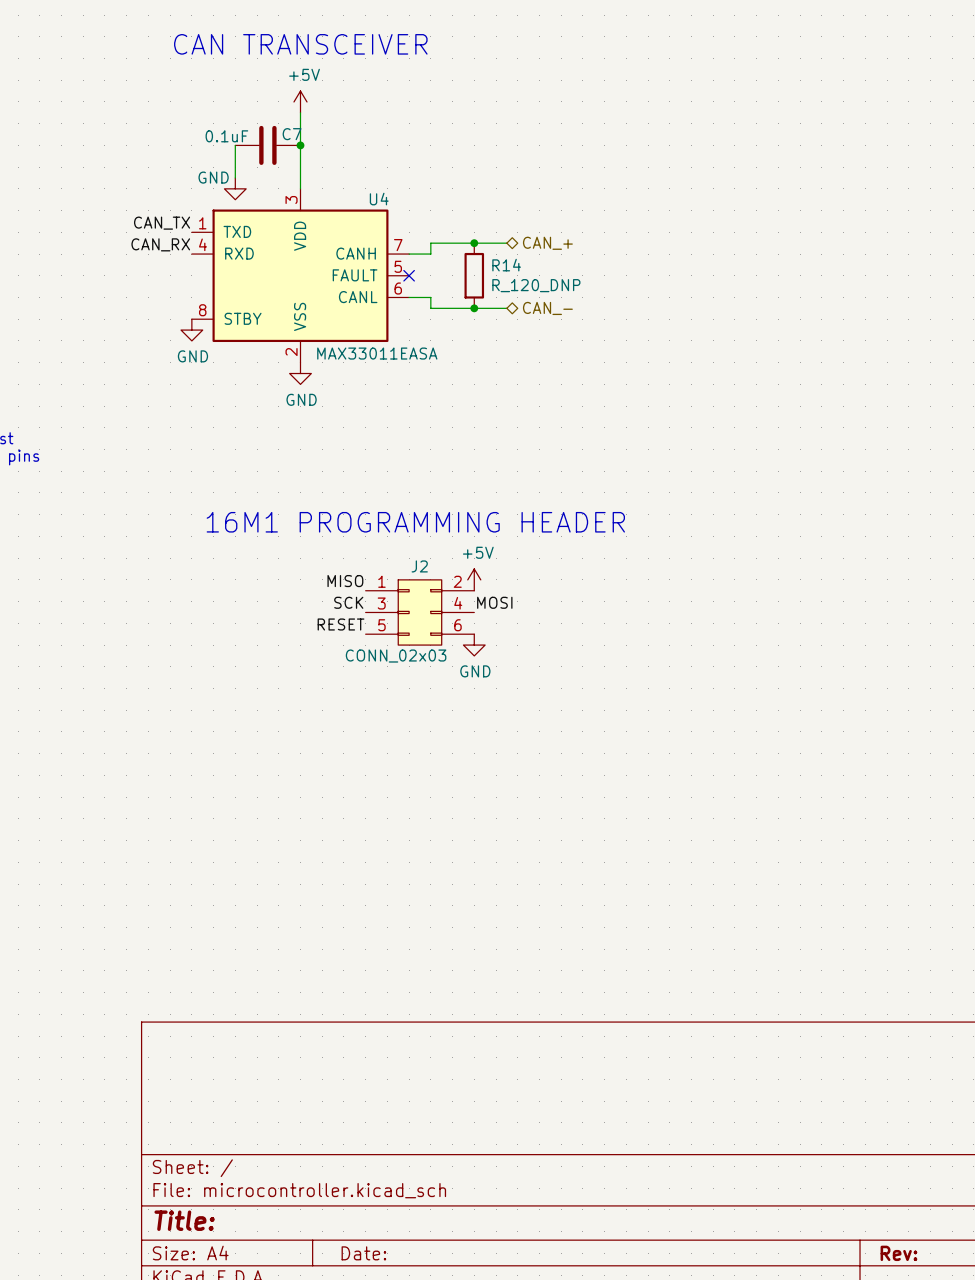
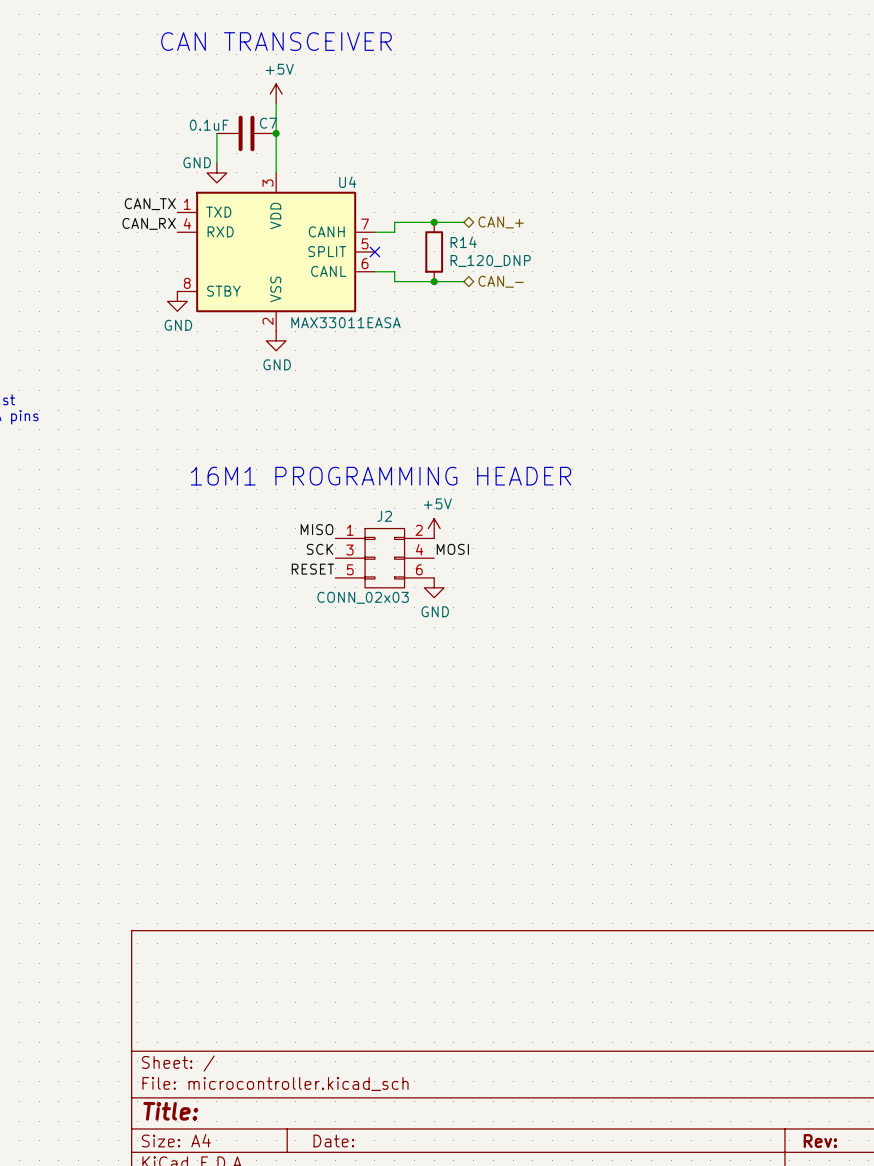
U4 pin name: FAULT (355, 275) -> SPLIT (327, 251)
J2 symbol: [365, 579, 475, 646] -> [335, 528, 435, 588]

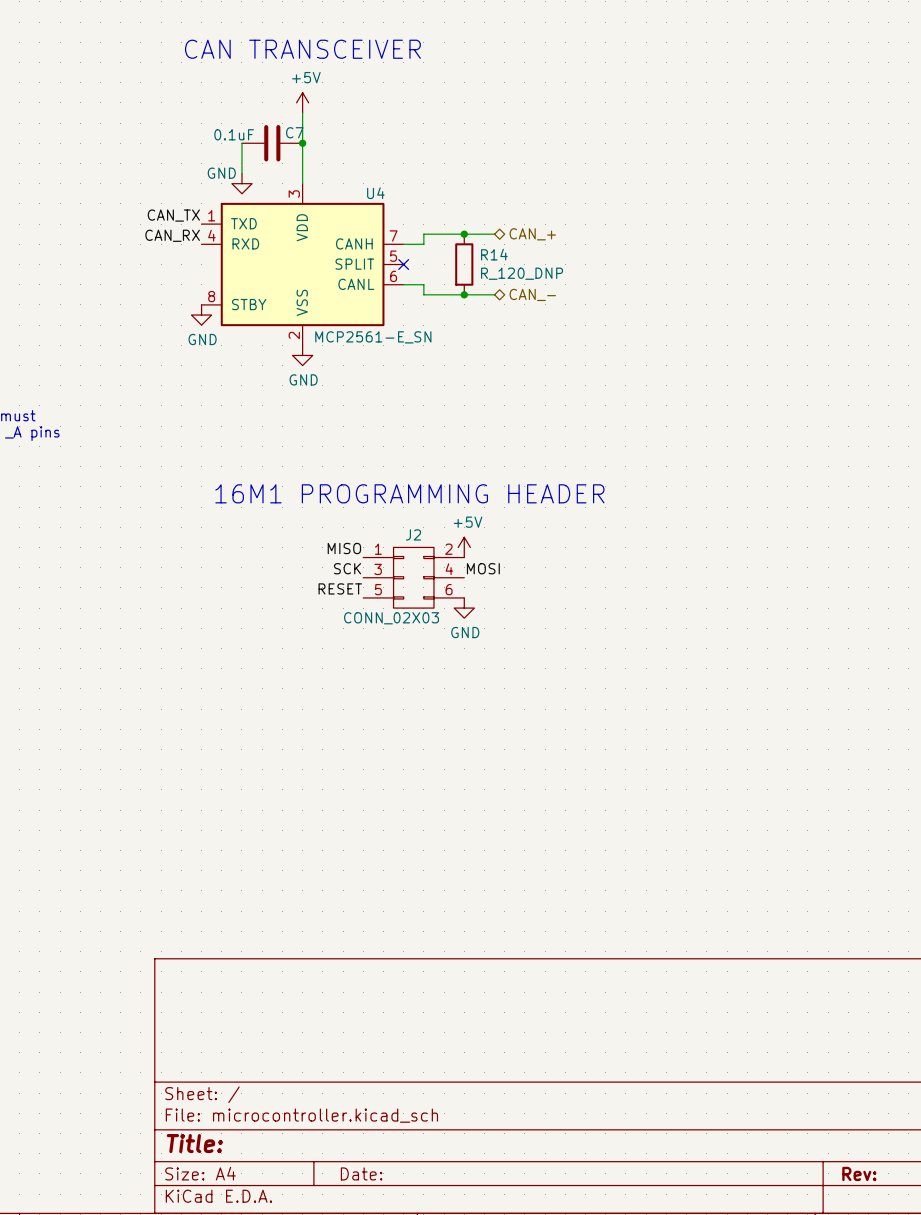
U4 value: MAX33011EASA (346, 322) -> MCP2561-E_SN (373, 337)
J2 value: CONN_02x03 (363, 597) -> CONN_02X03 (391, 618)

